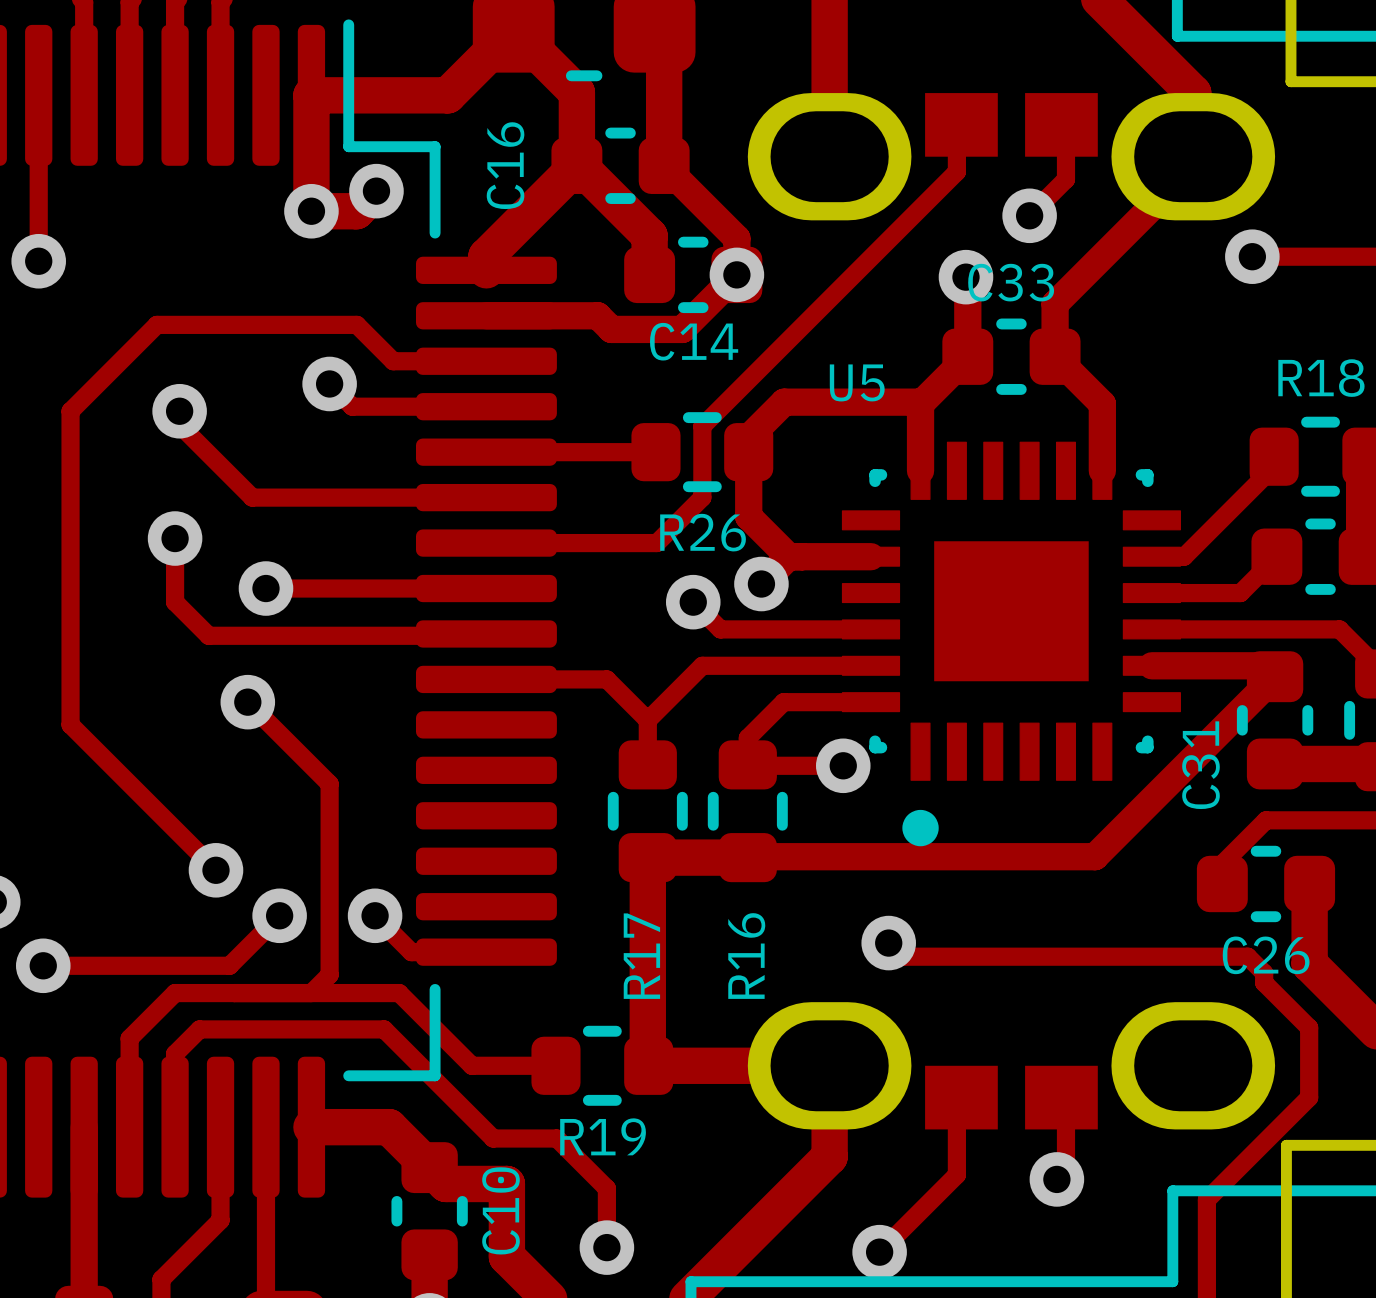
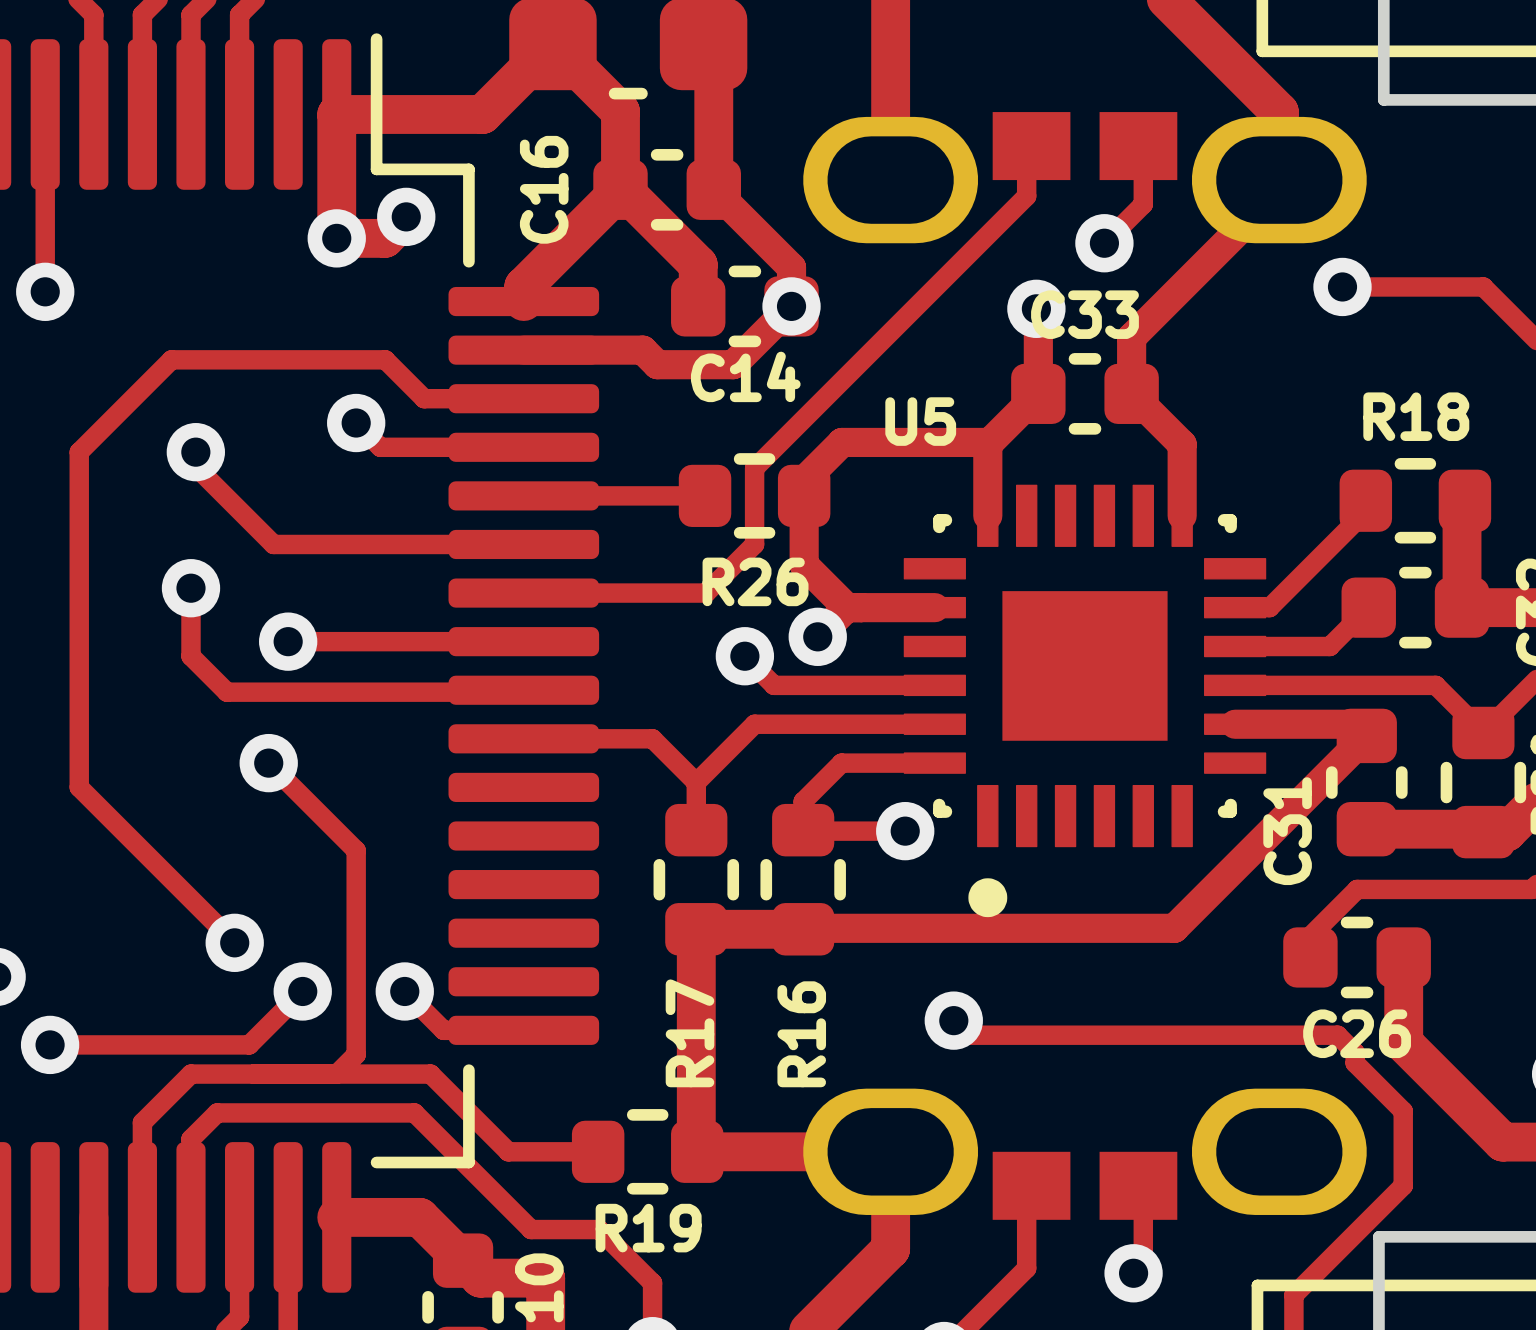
part footprint: [747, 93, 1276, 221] -> [803, 112, 1367, 244]
part footprint: [747, 1002, 1276, 1130] -> [803, 1088, 1367, 1220]

